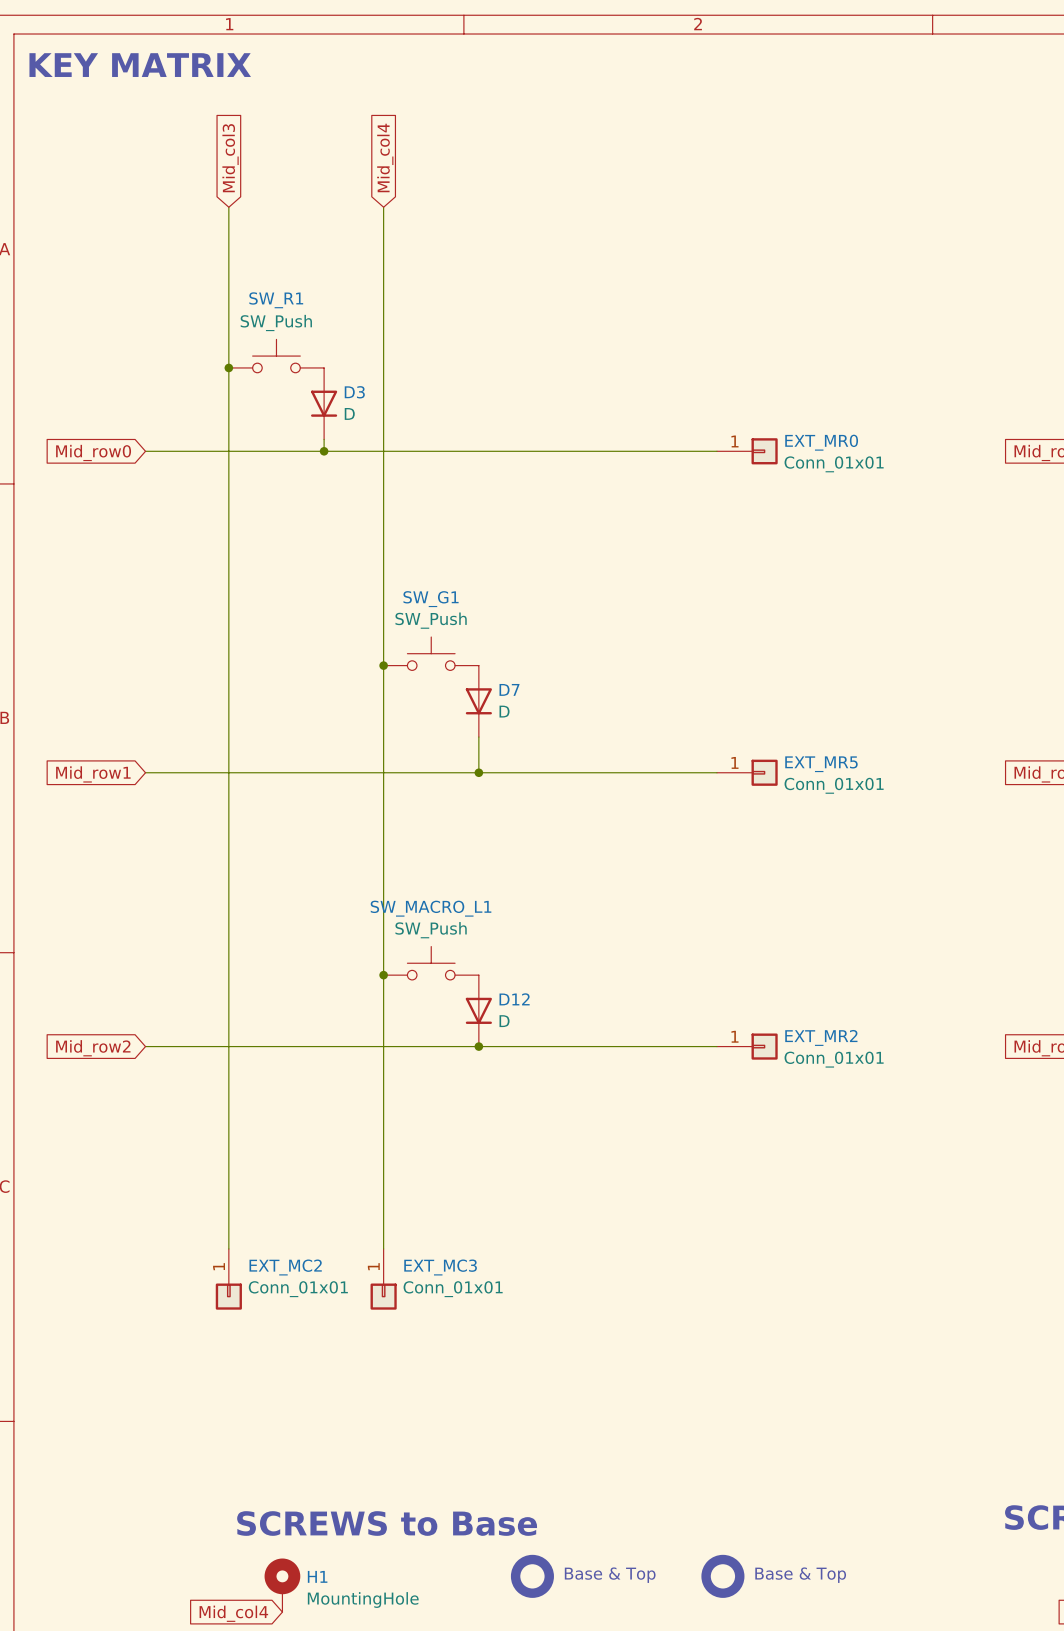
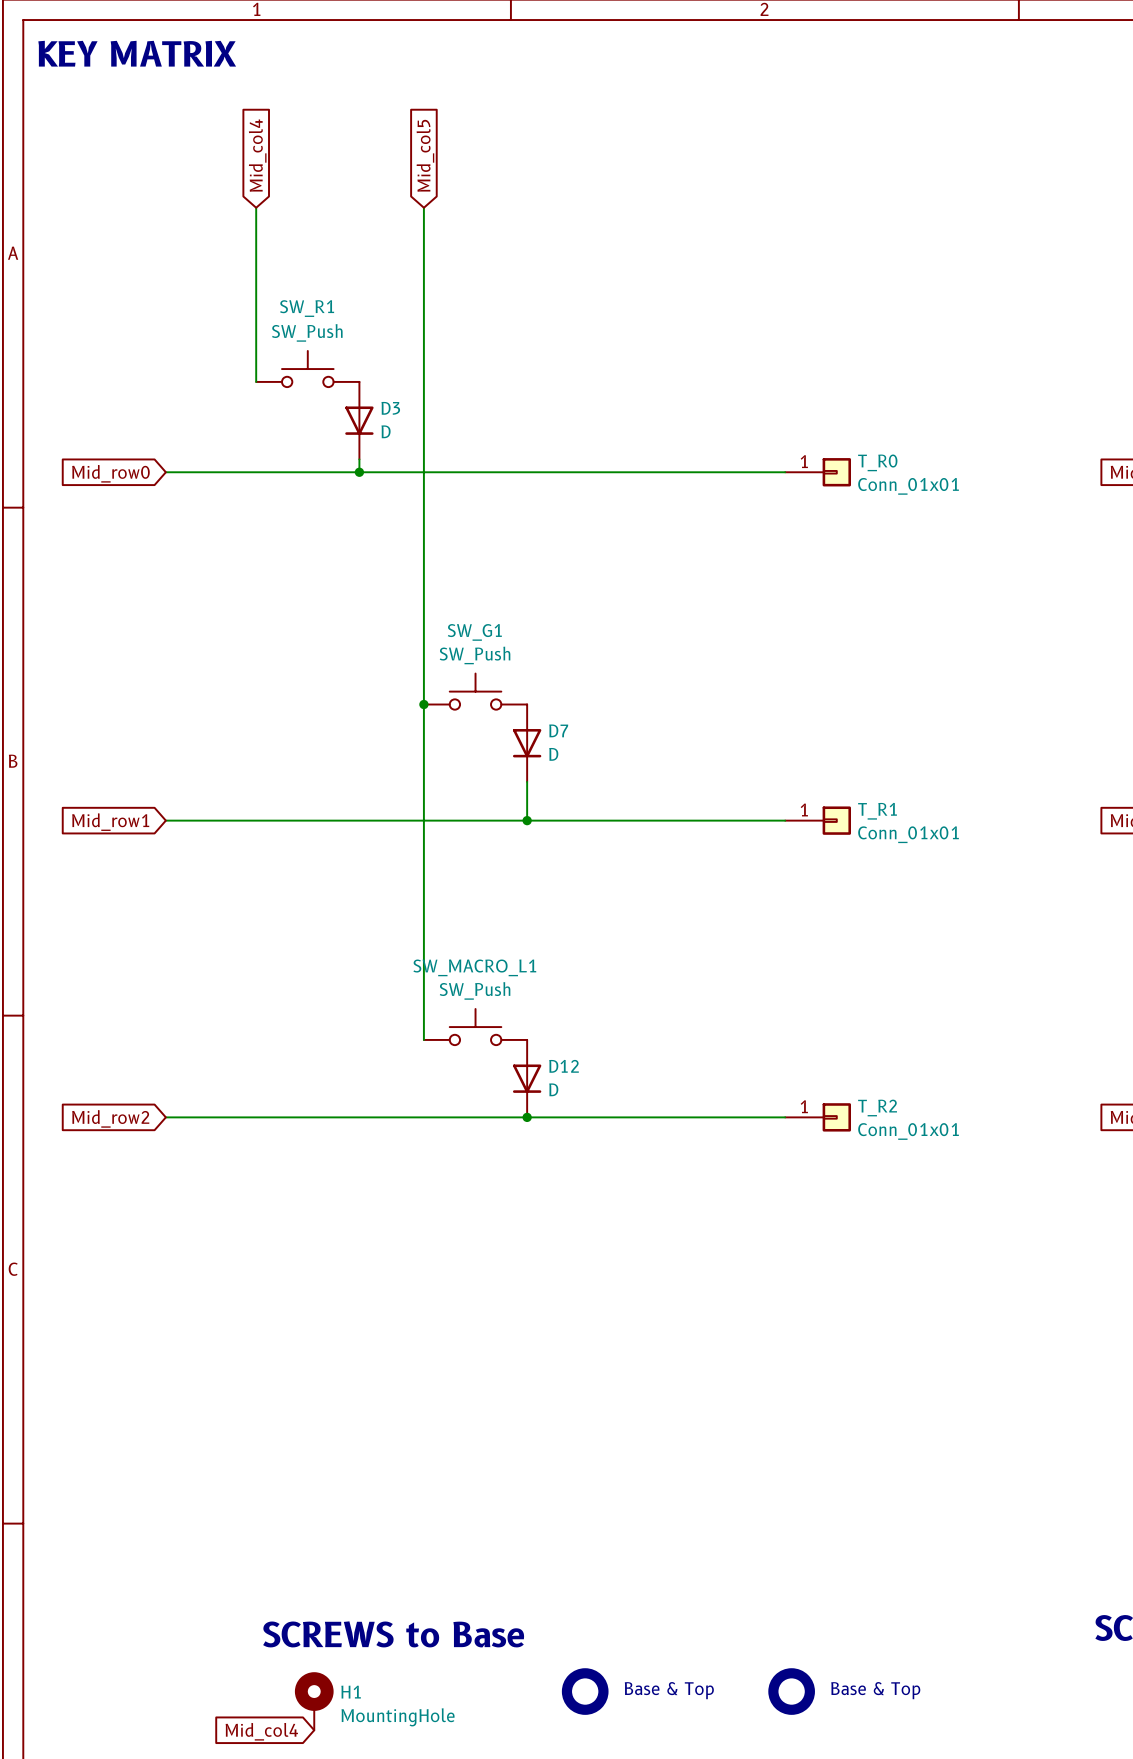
global label: Mid_col4 (385, 157) -> Mid_col5 (425, 155)
global label: Mid_col3 (230, 158) -> Mid_col4 (257, 155)
wire: (228, 367) (228, 1248) -> none
junction: (228, 367) -> none
EXT_MR0 name: EXT_MR0 (821, 442) -> T_R0 (877, 462)
EXT_MR5 name: EXT_MR5 (821, 764) -> T_R1 (877, 811)
wire: (383, 975) (383, 1248) -> none
junction: (383, 975) -> none
EXT_MR2 name: EXT_MR2 (821, 1037) -> T_R2 (877, 1108)
EXT_MC2: Conn_01x01 (228, 1279) -> none
EXT_MC3: Conn_01x01 (383, 1279) -> none

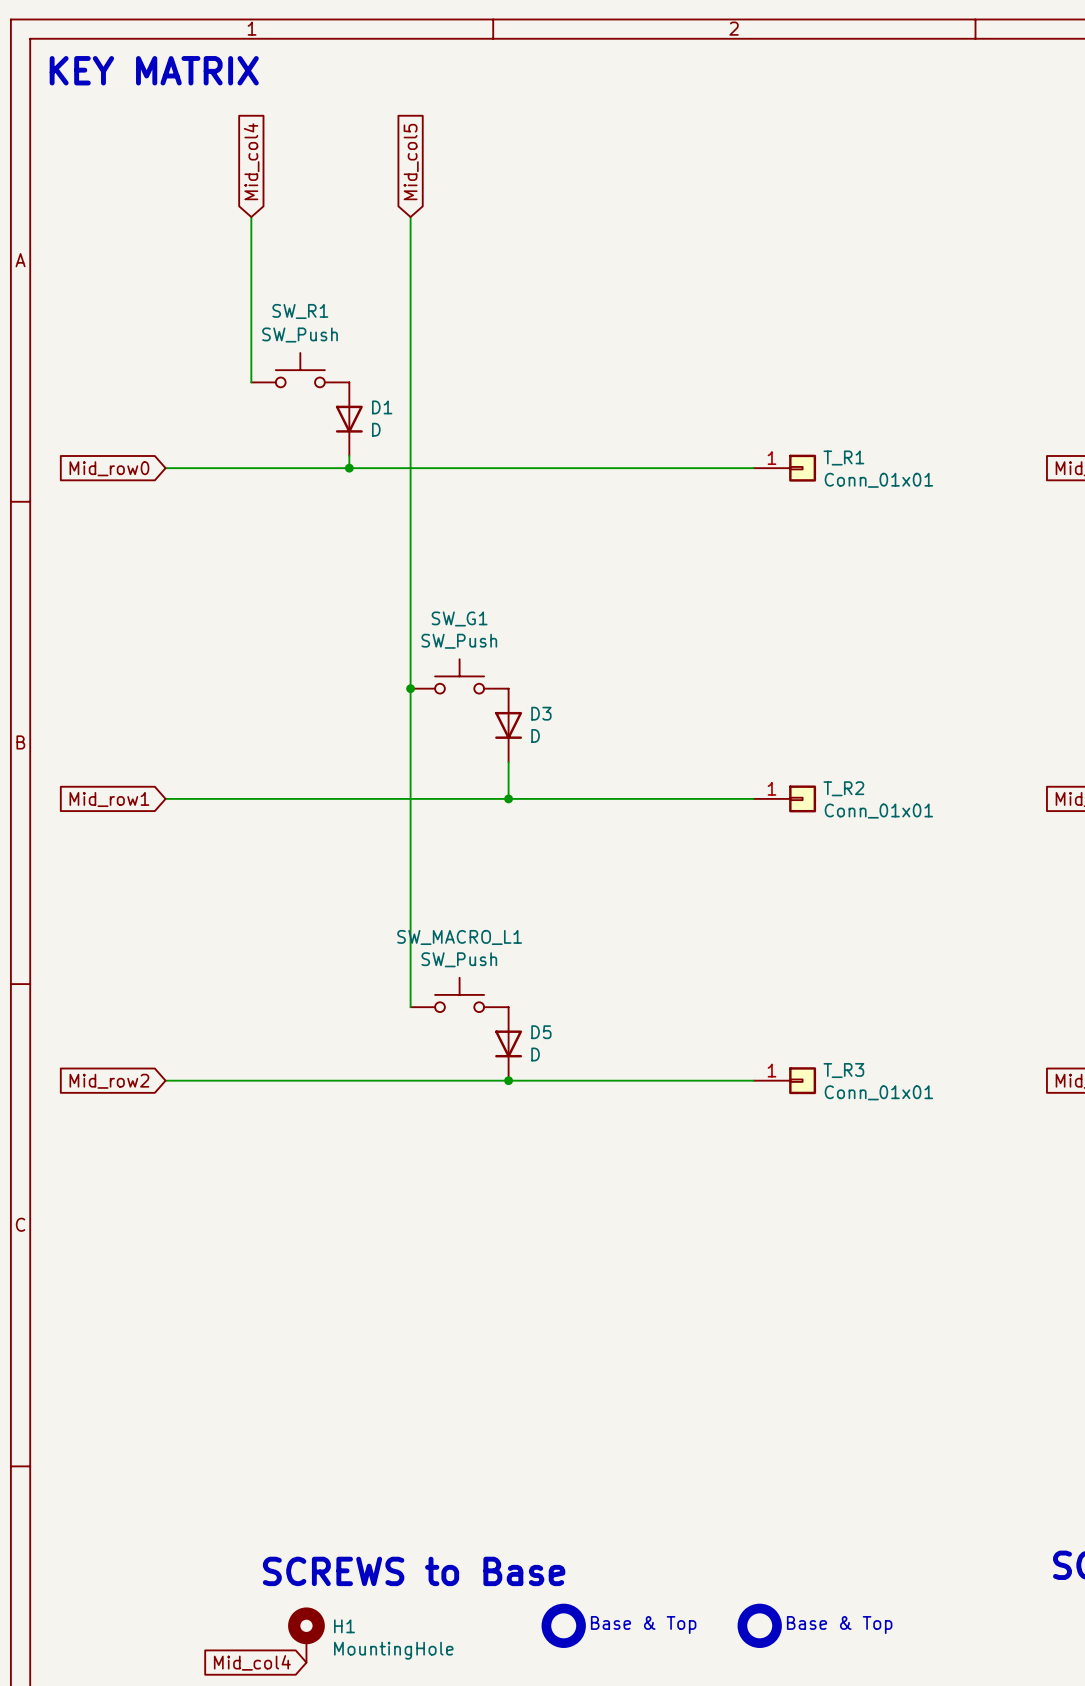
D3 name: D3 (390, 408) -> D1 (382, 407)
T_R0 name: T_R0 (877, 462) -> T_R1 (843, 458)
D7 name: D7 (558, 730) -> D3 (541, 713)
T_R1 name: T_R1 (877, 811) -> T_R2 (843, 788)
D12 name: D12 (564, 1066) -> D5 (541, 1032)
T_R2 name: T_R2 (877, 1108) -> T_R3 (843, 1070)

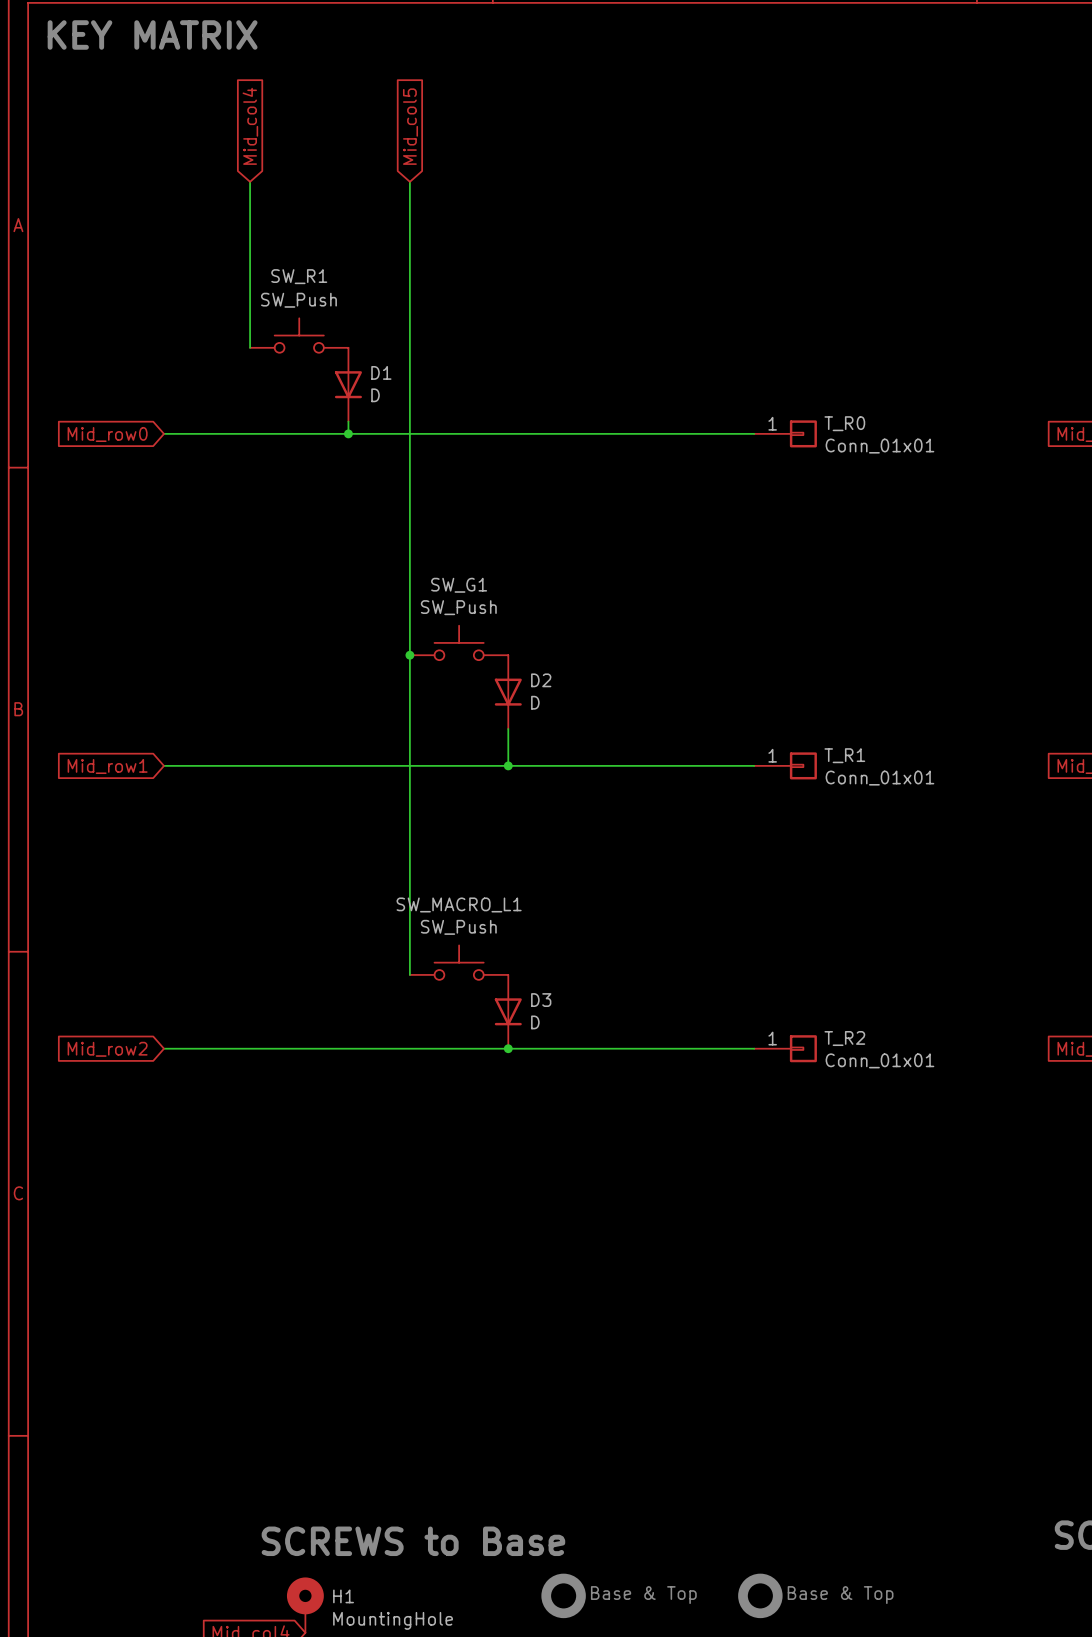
T_R1 name: T_R1 (843, 458) -> T_R0 (844, 423)
D3 name: D3 (541, 713) -> D2 (541, 680)
T_R2 name: T_R2 (843, 788) -> T_R1 (844, 755)
D5 name: D5 (541, 1032) -> D3 (541, 1000)
T_R3 name: T_R3 (843, 1070) -> T_R2 (844, 1038)

